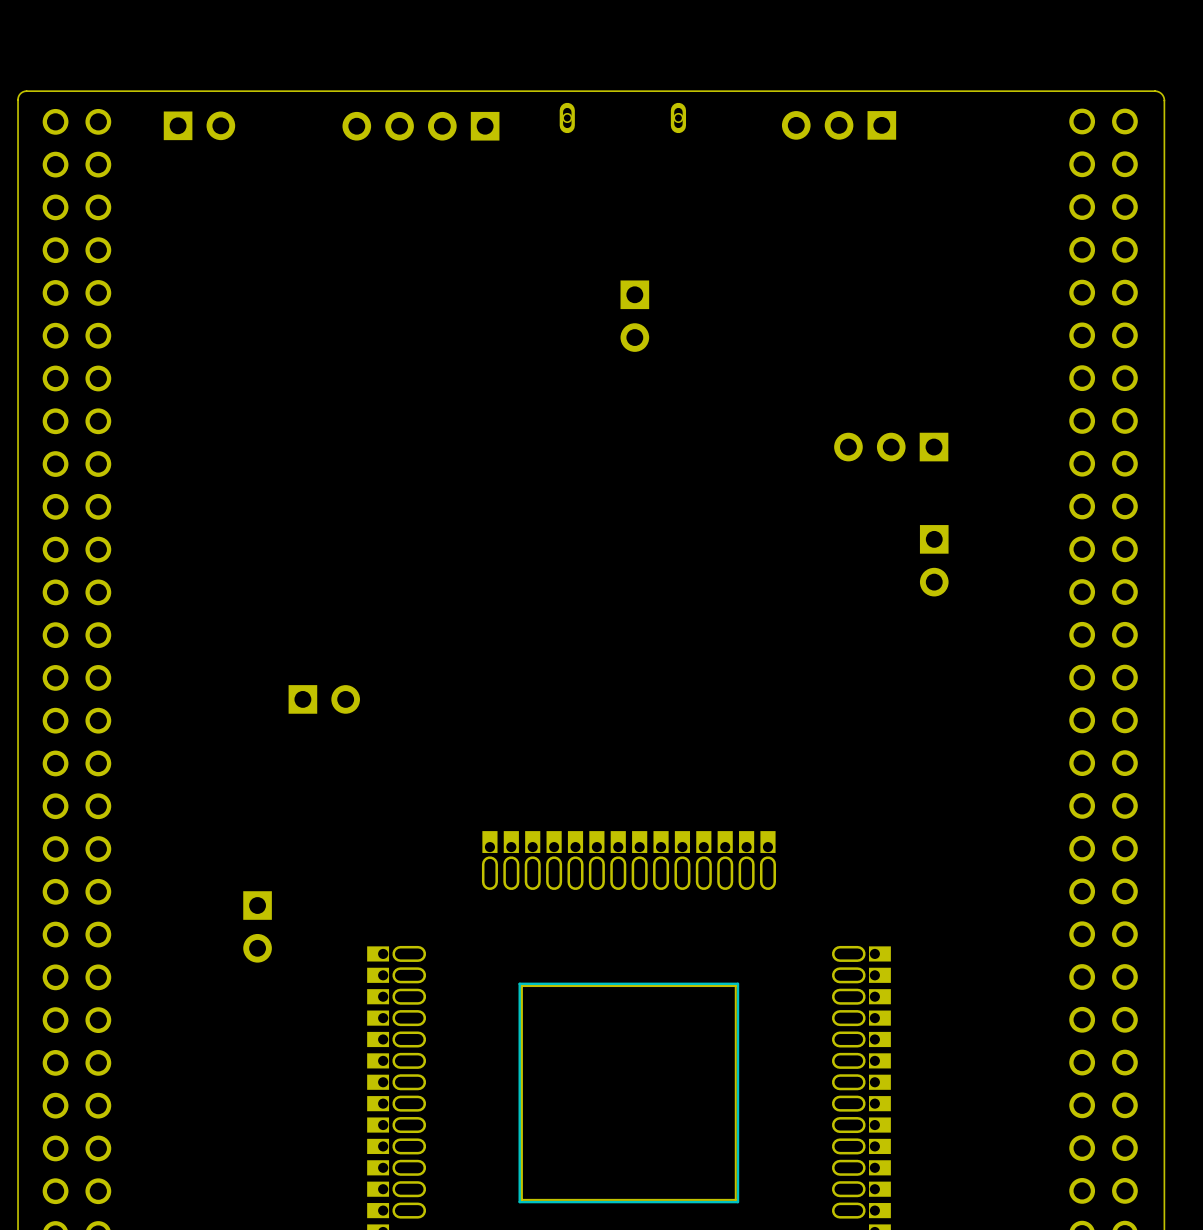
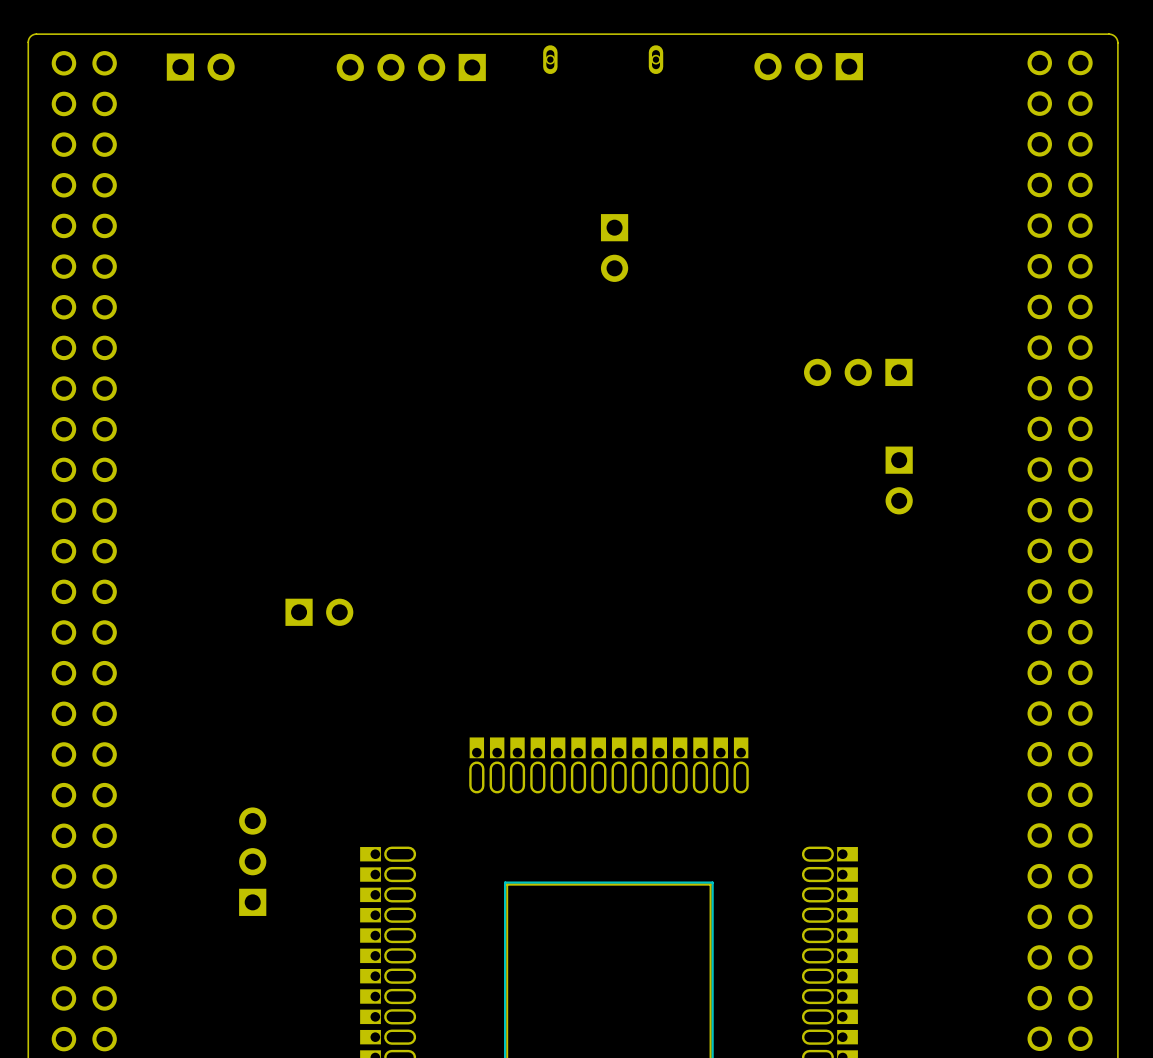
part: (257, 926) -> none
part: none -> (252, 861)

